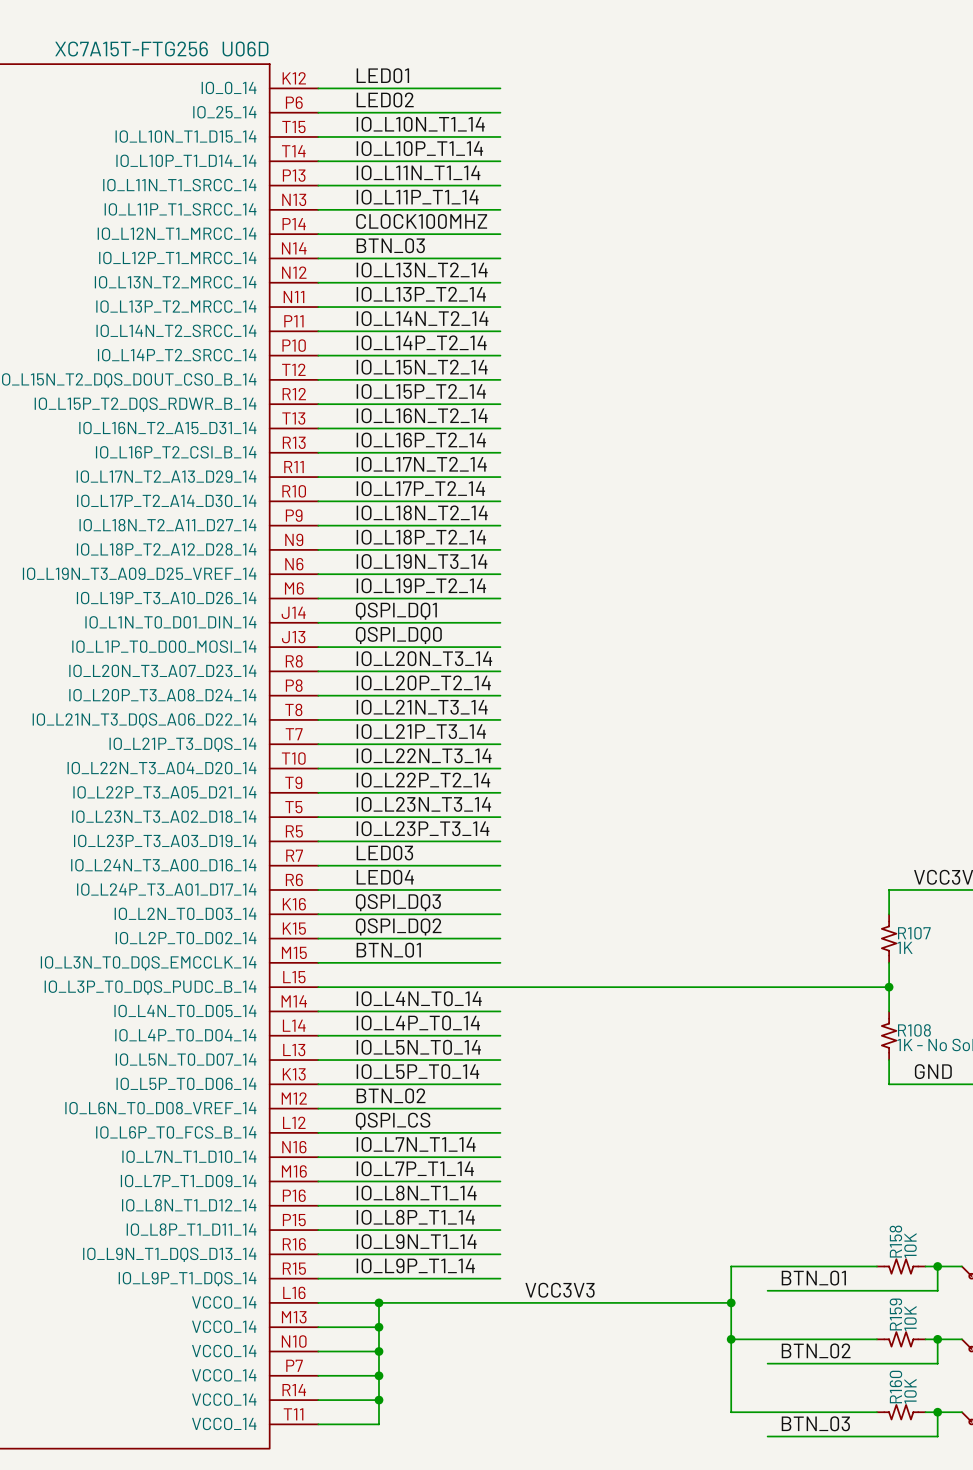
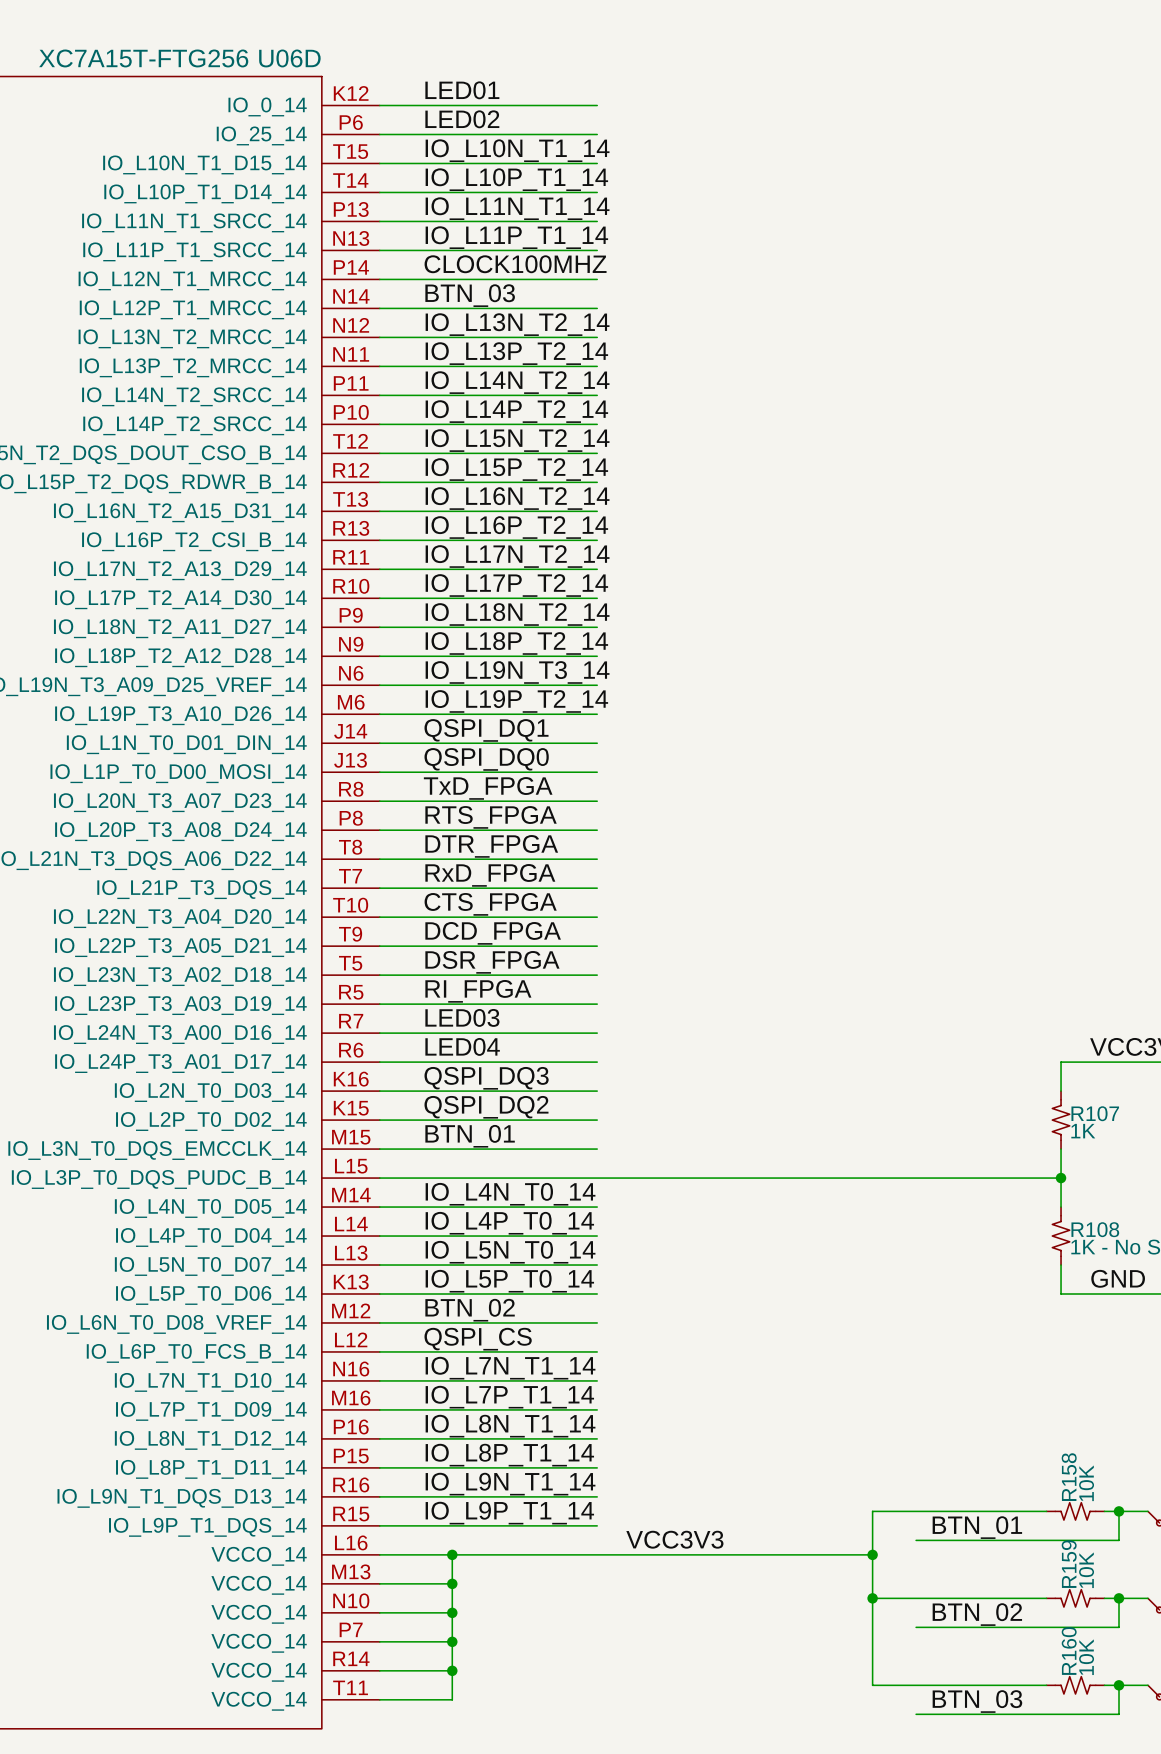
label: IO_L20N_T3_14 (424, 658) -> TxD_FPGA (488, 788)
label: IO_L20P_T2_14 (423, 682) -> RTS_FPGA (491, 817)
label: IO_L21N_T3_14 (422, 707) -> DTR_FPGA (491, 846)
label: IO_L21P_T3_14 (421, 731) -> RxD_FPGA (490, 875)
label: IO_L22N_T3_14 (424, 755) -> CTS_FPGA (490, 904)
label: IO_L22P_T2_14 (423, 780) -> DCD_FPGA (493, 933)
label: IO_L23N_T3_14 (423, 804) -> DSR_FPGA (492, 962)
label: IO_L23P_T3_14 (423, 828) -> RI_FPGA (478, 991)

